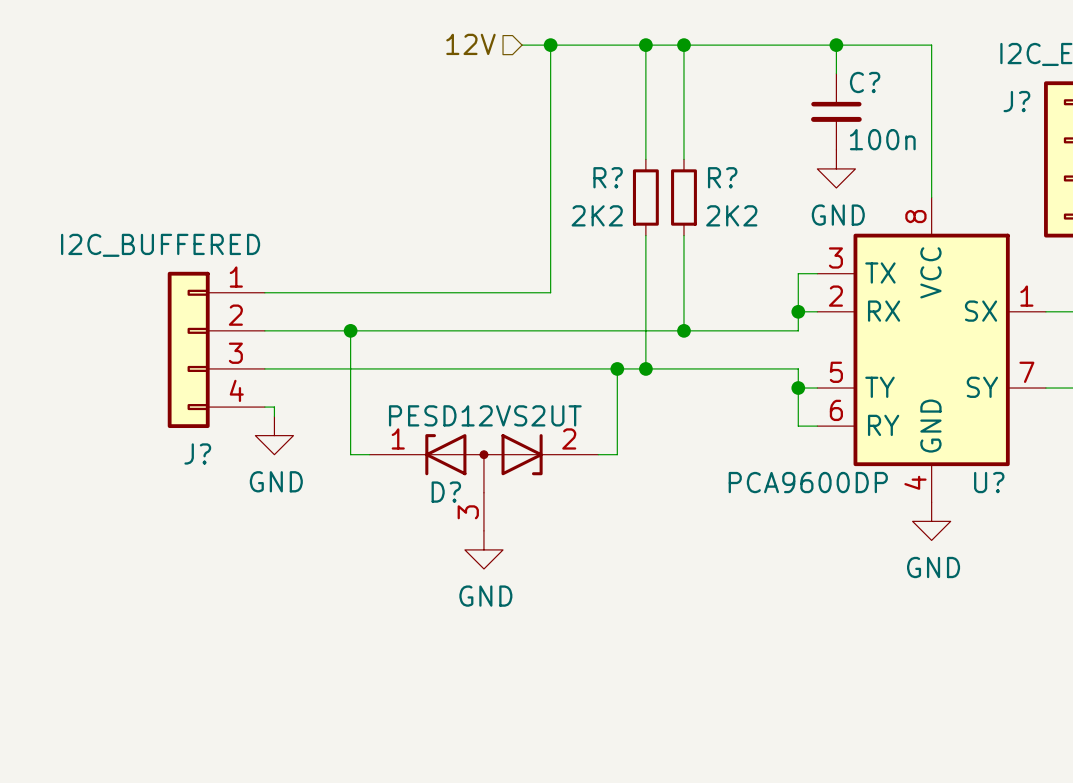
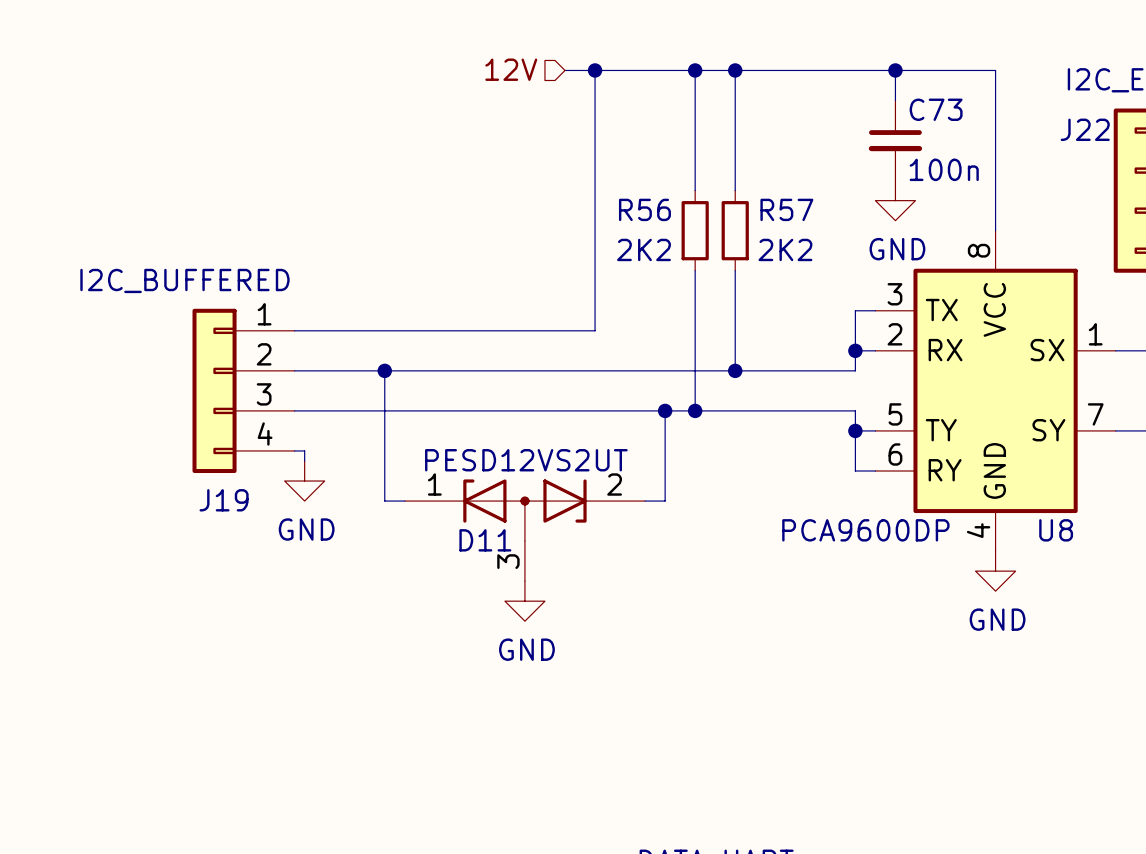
C? name: C? (865, 82) -> C73 (936, 109)
J? name: J? (1016, 101) -> J22 (1085, 129)
R? name: R? (608, 177) -> R56 (644, 209)
R? name: R? (722, 177) -> R57 (786, 209)
J? name: J? (197, 453) -> J19 (224, 500)
U? name: U? (989, 482) -> U8 (1056, 530)
D? name: D? (446, 492) -> D11 (485, 540)

